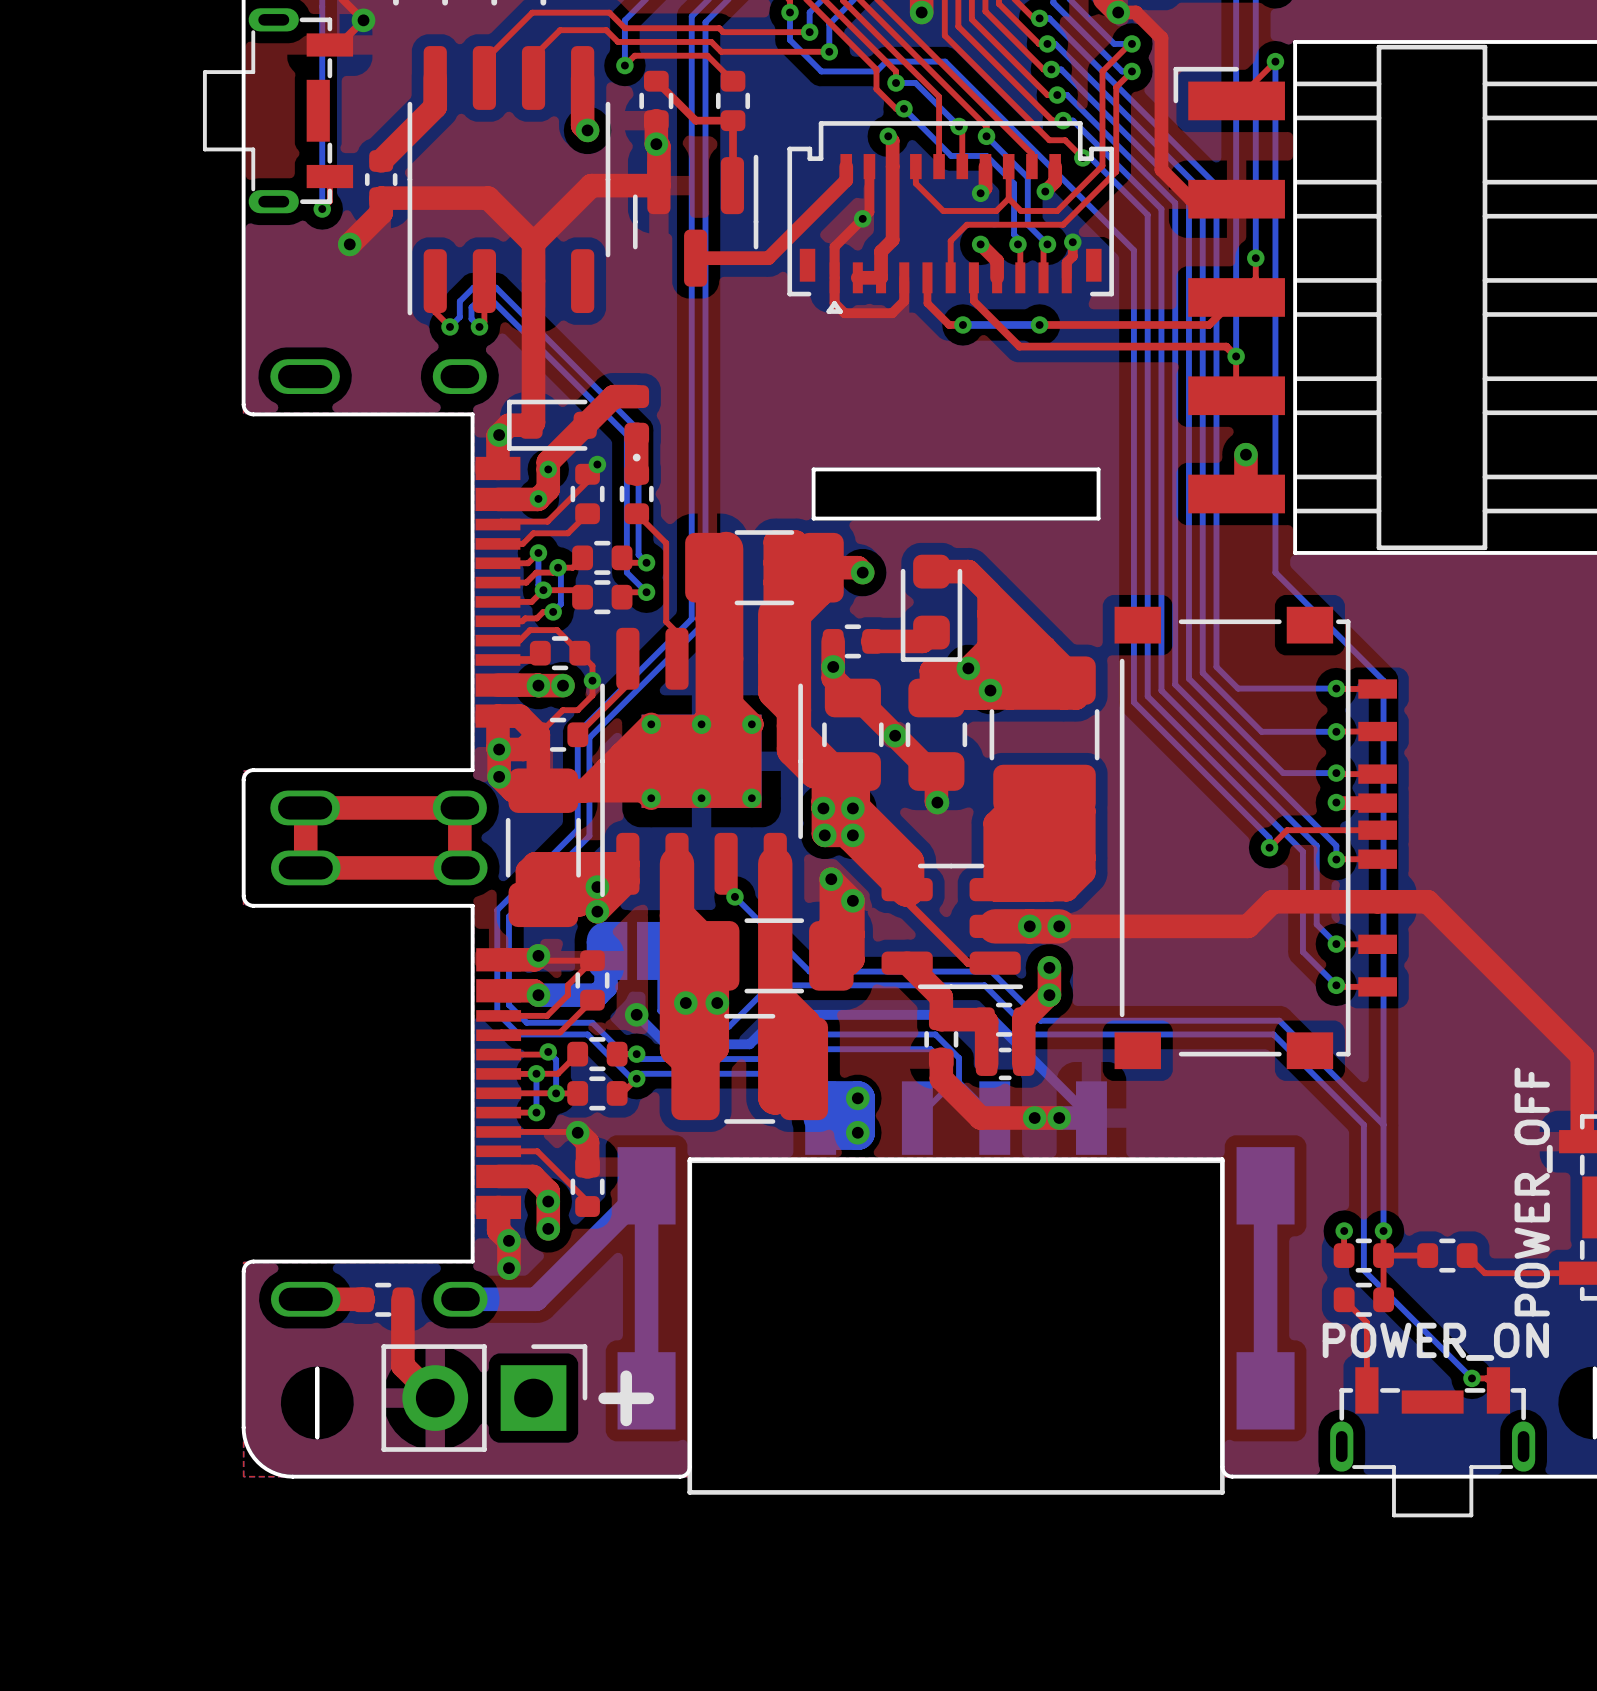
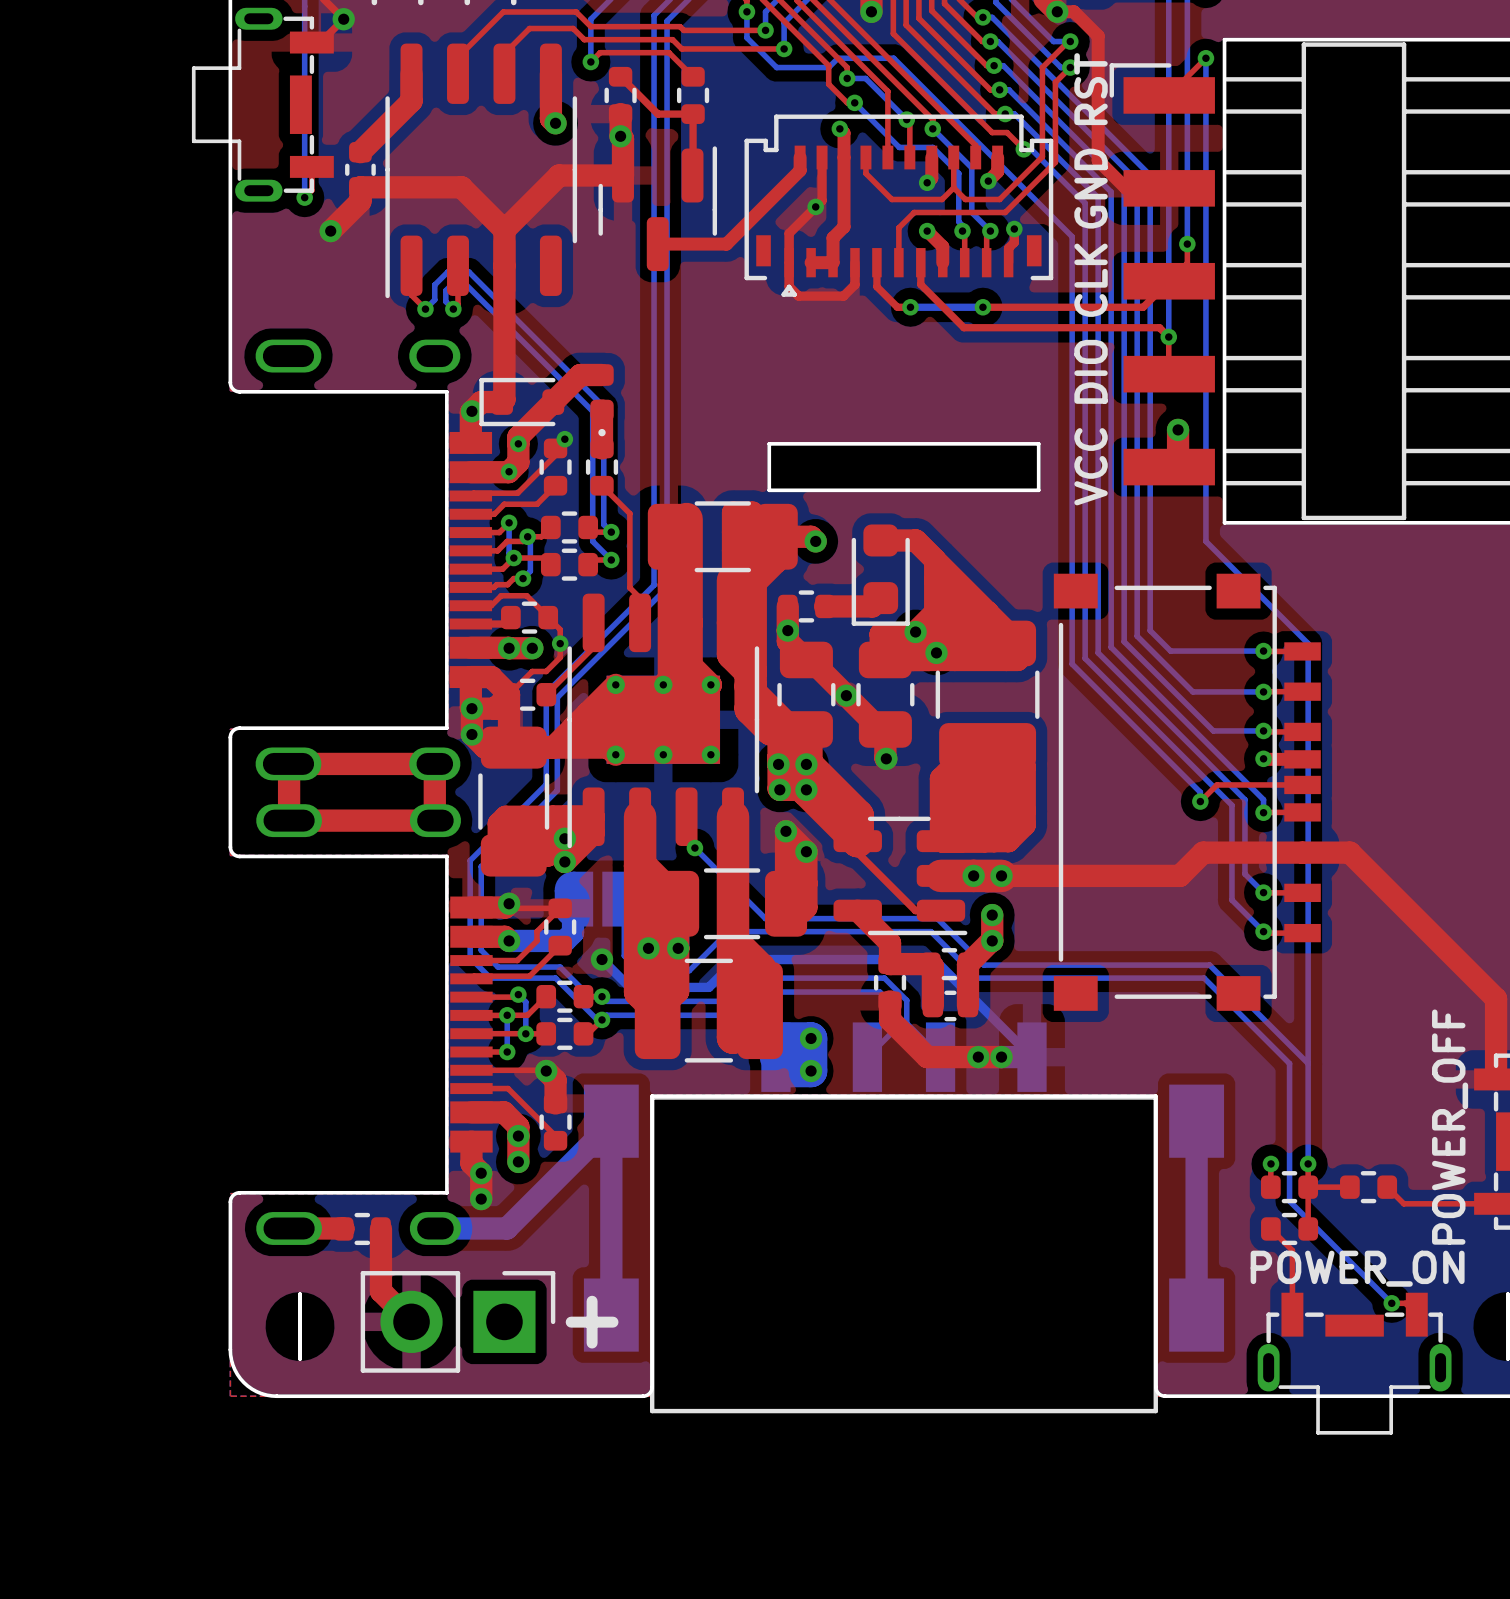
text: none -> RST (1091, 89)
text: none -> GND (1091, 188)
text: none -> CLK (1091, 280)
text: none -> DIO (1091, 371)
text: none -> VCC (1091, 466)

